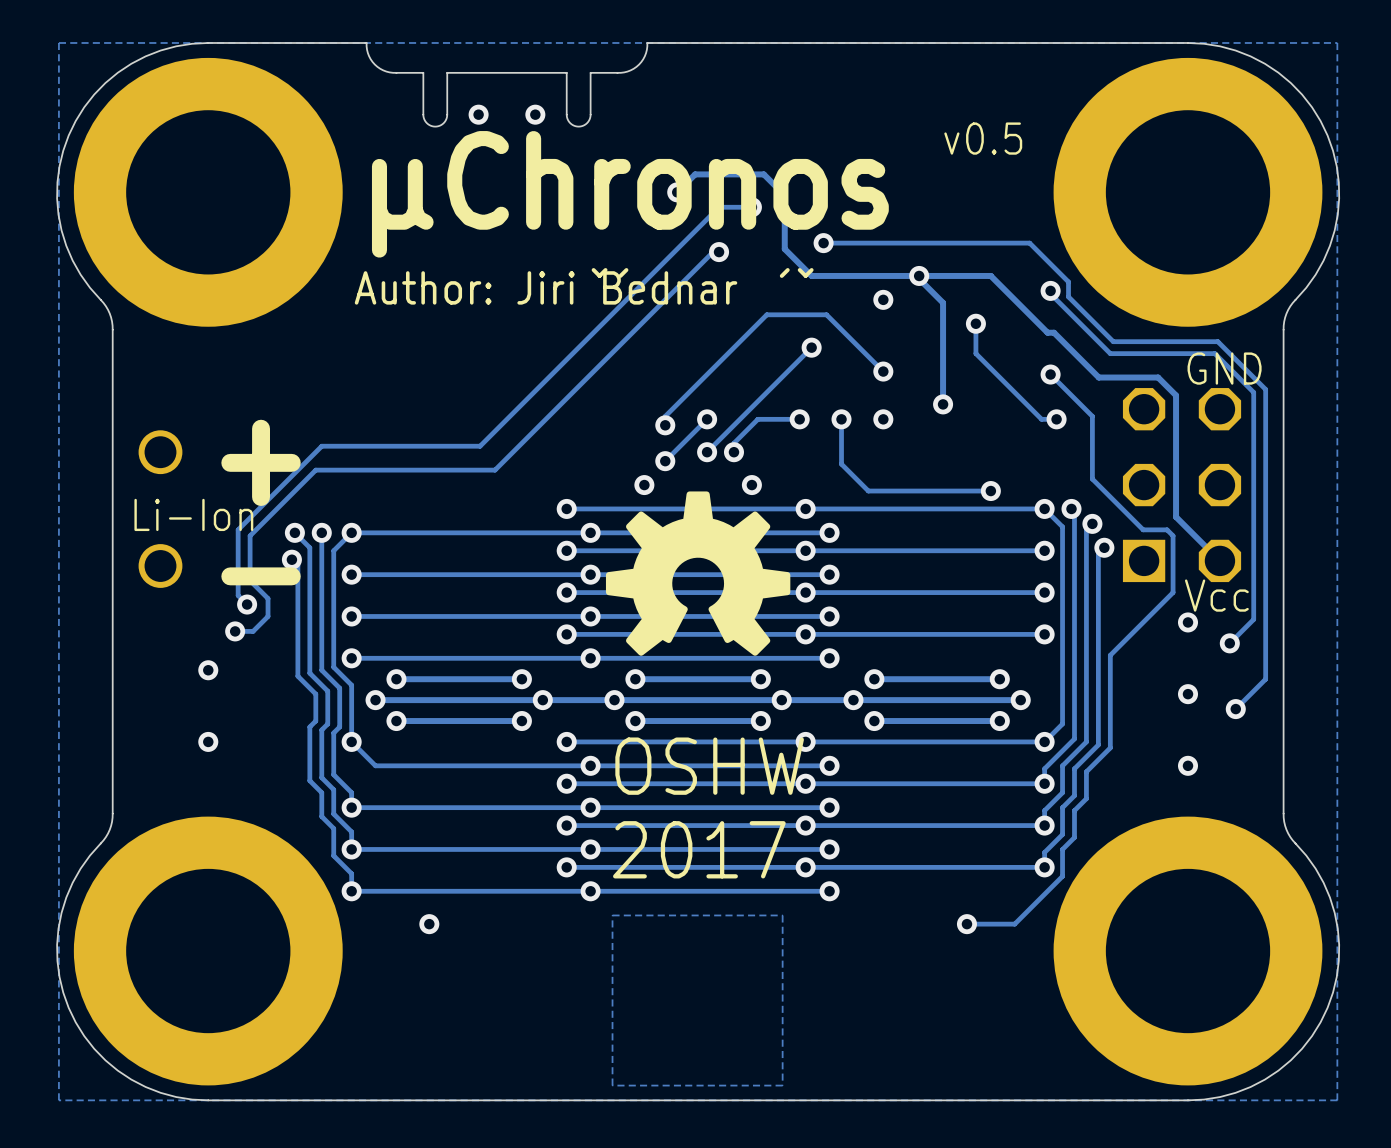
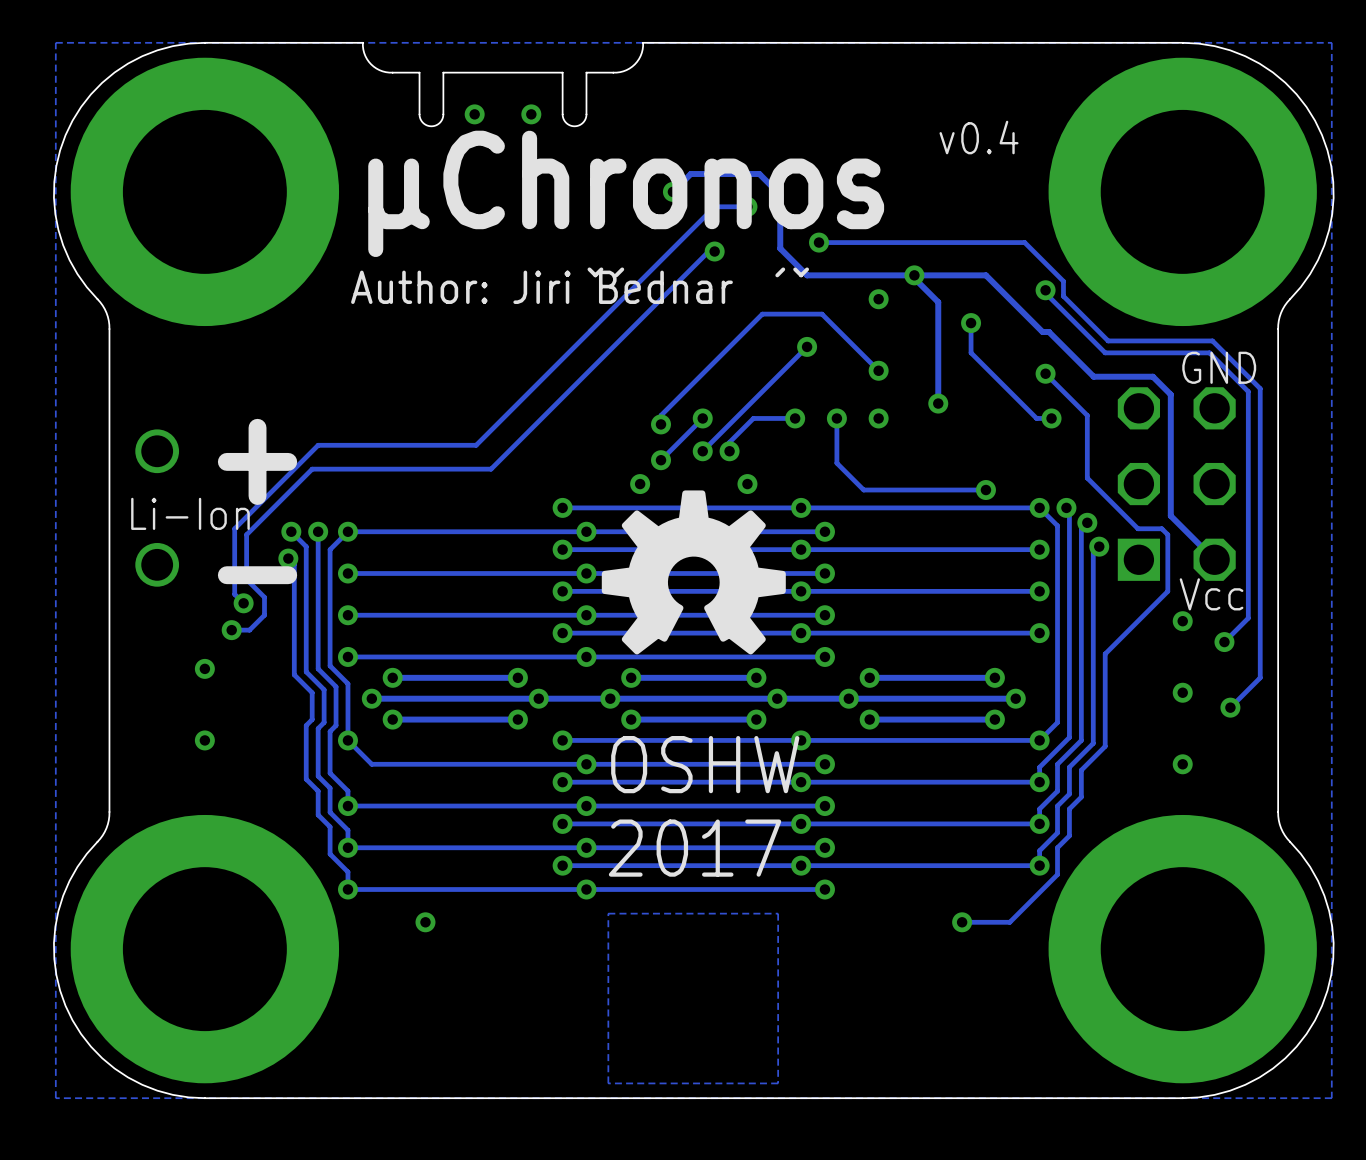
text: v0.5 (983, 138) -> v0.4 (979, 137)

